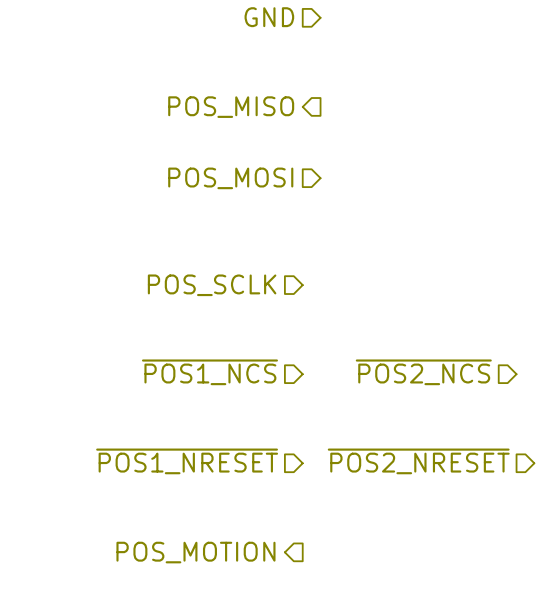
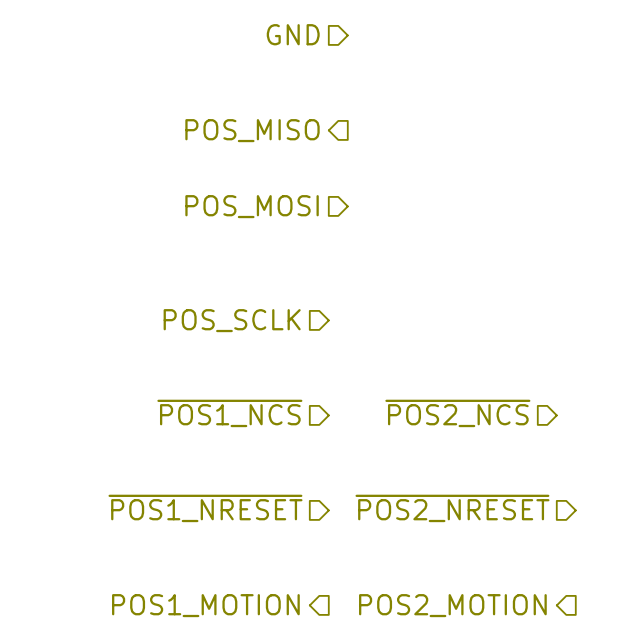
hierarchical label: POS_MOTION (195, 552) -> POS1_MOTION (205, 605)
hierarchical label: none -> POS2_MOTION (452, 605)

